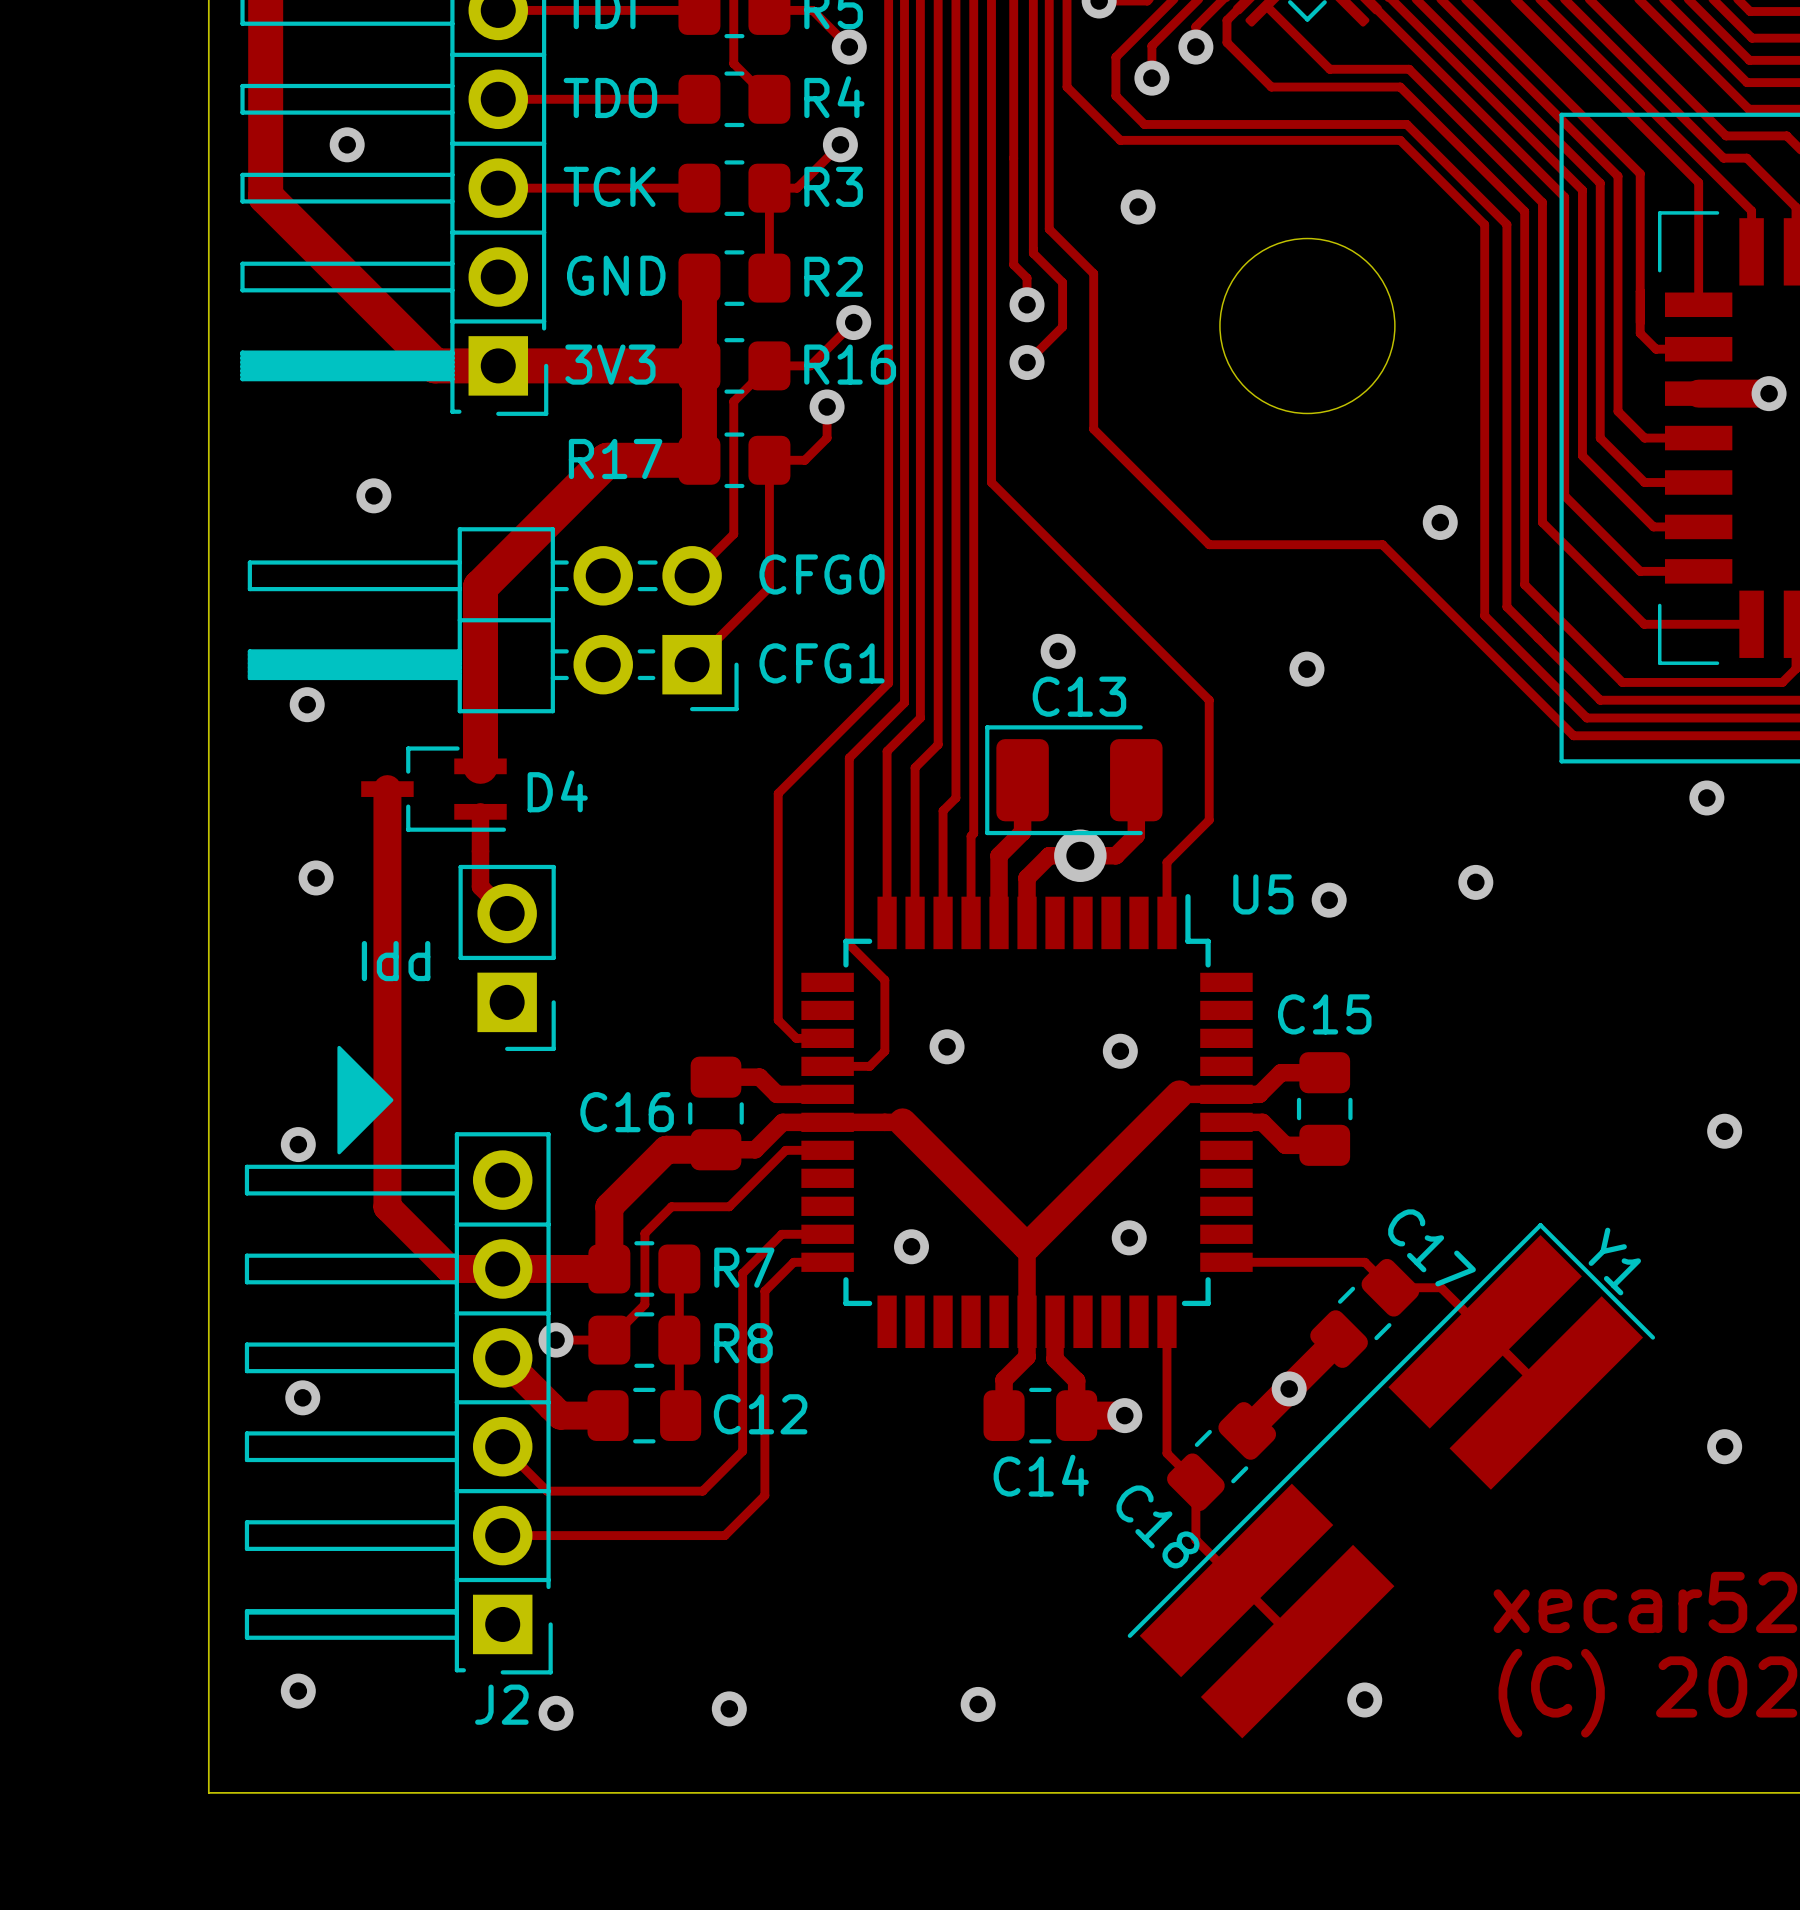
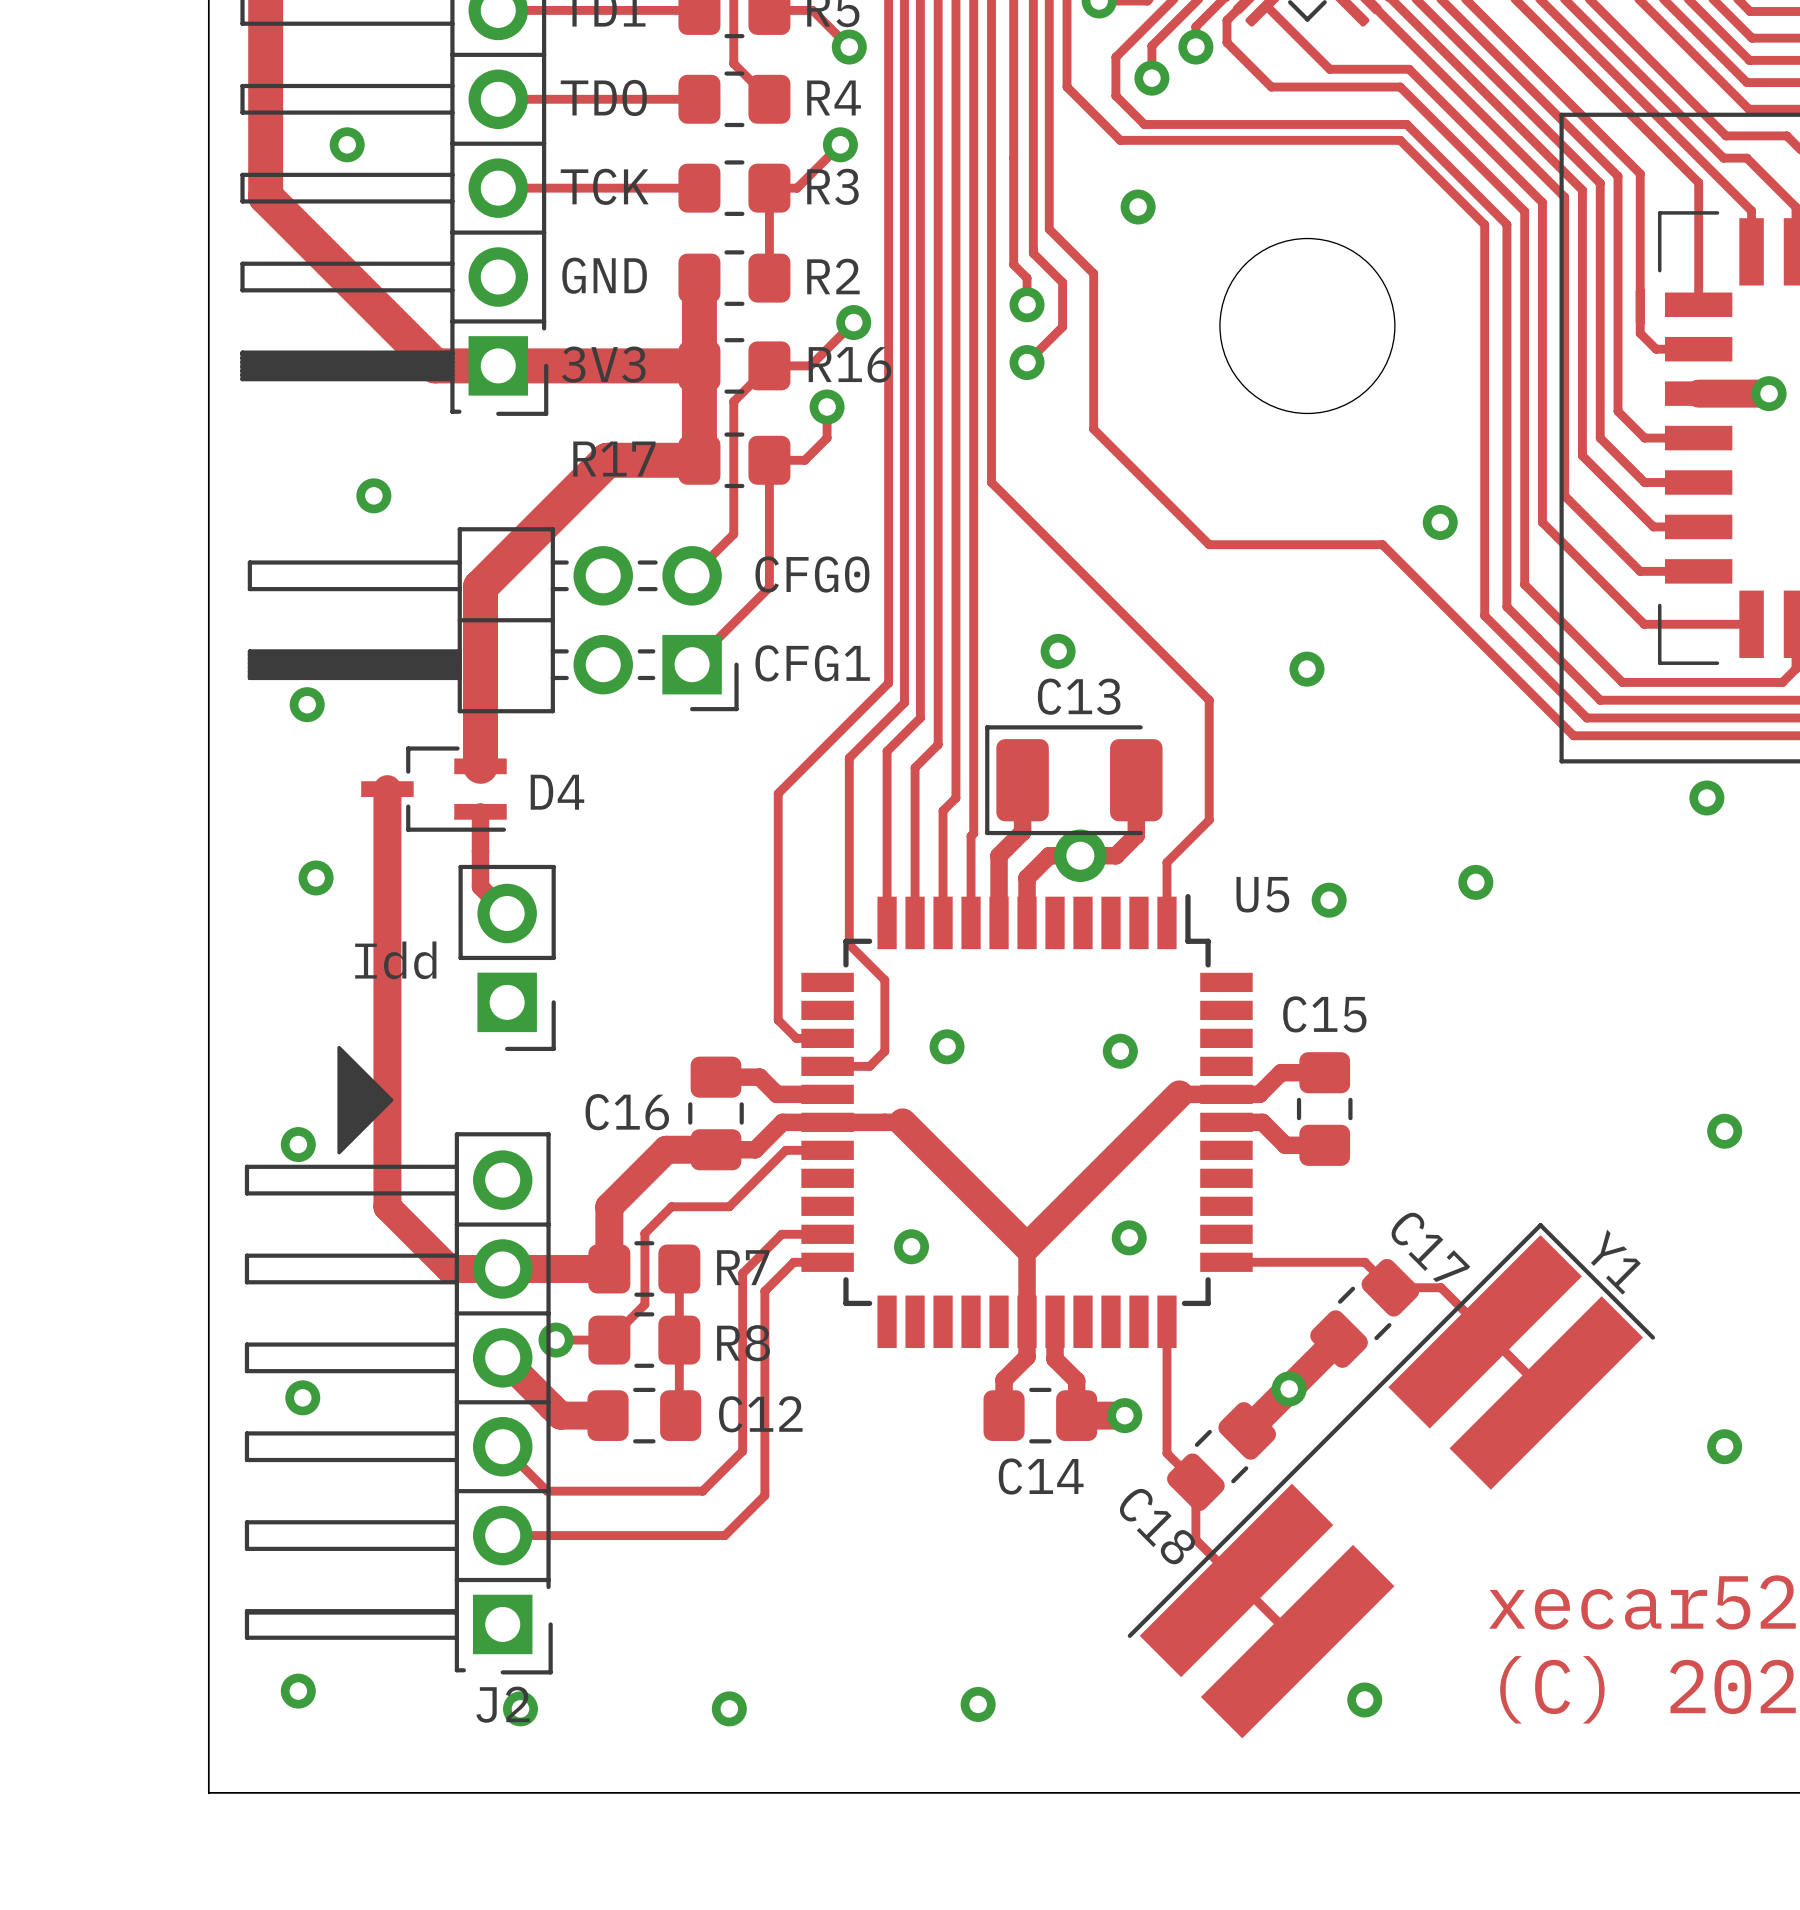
via position: (556, 1713) -> (520, 1708)

